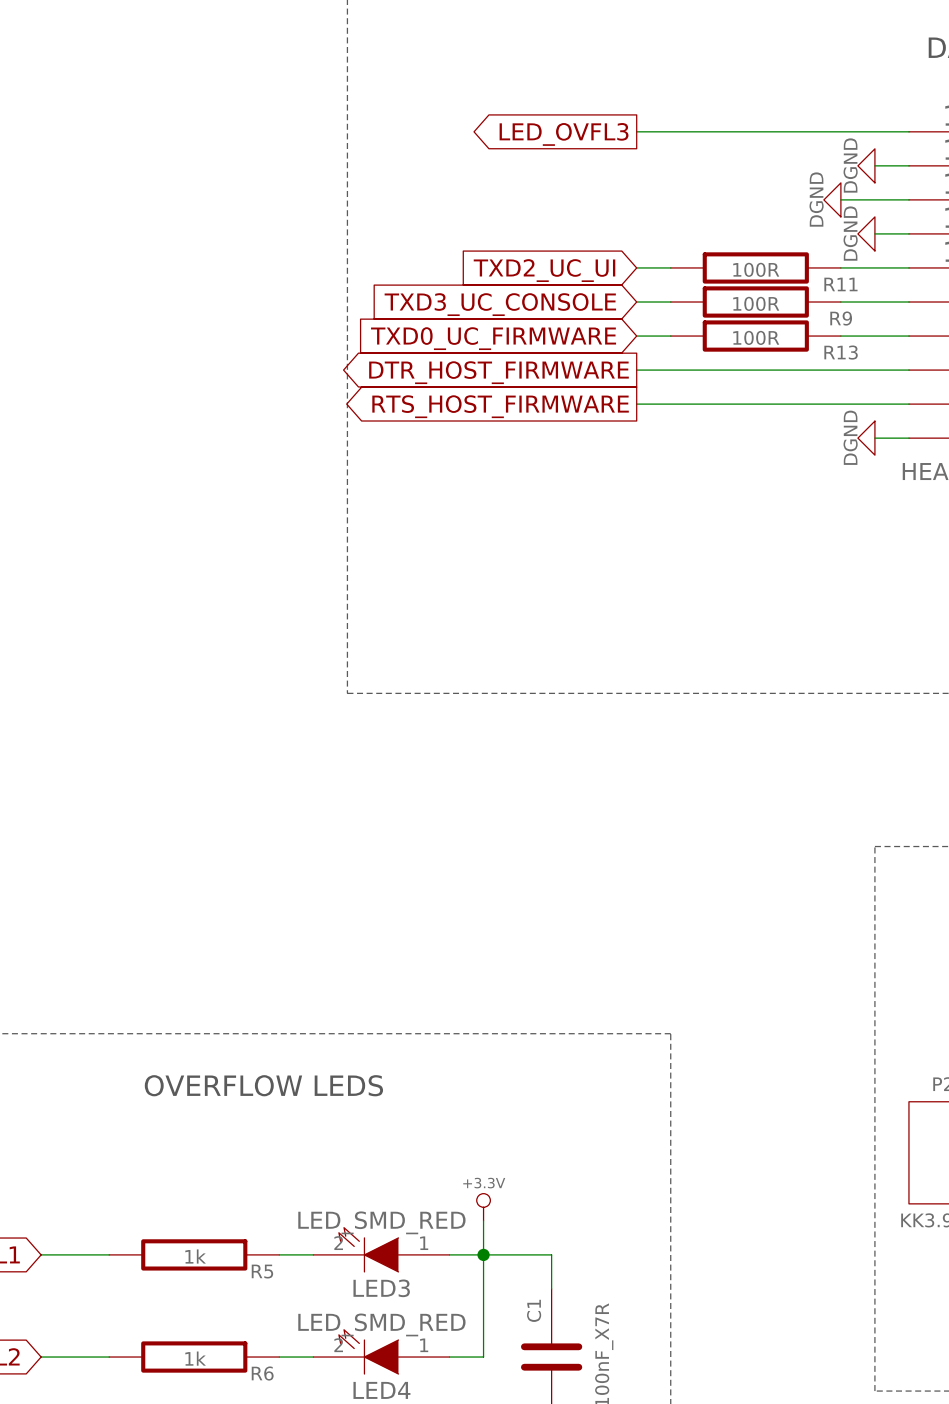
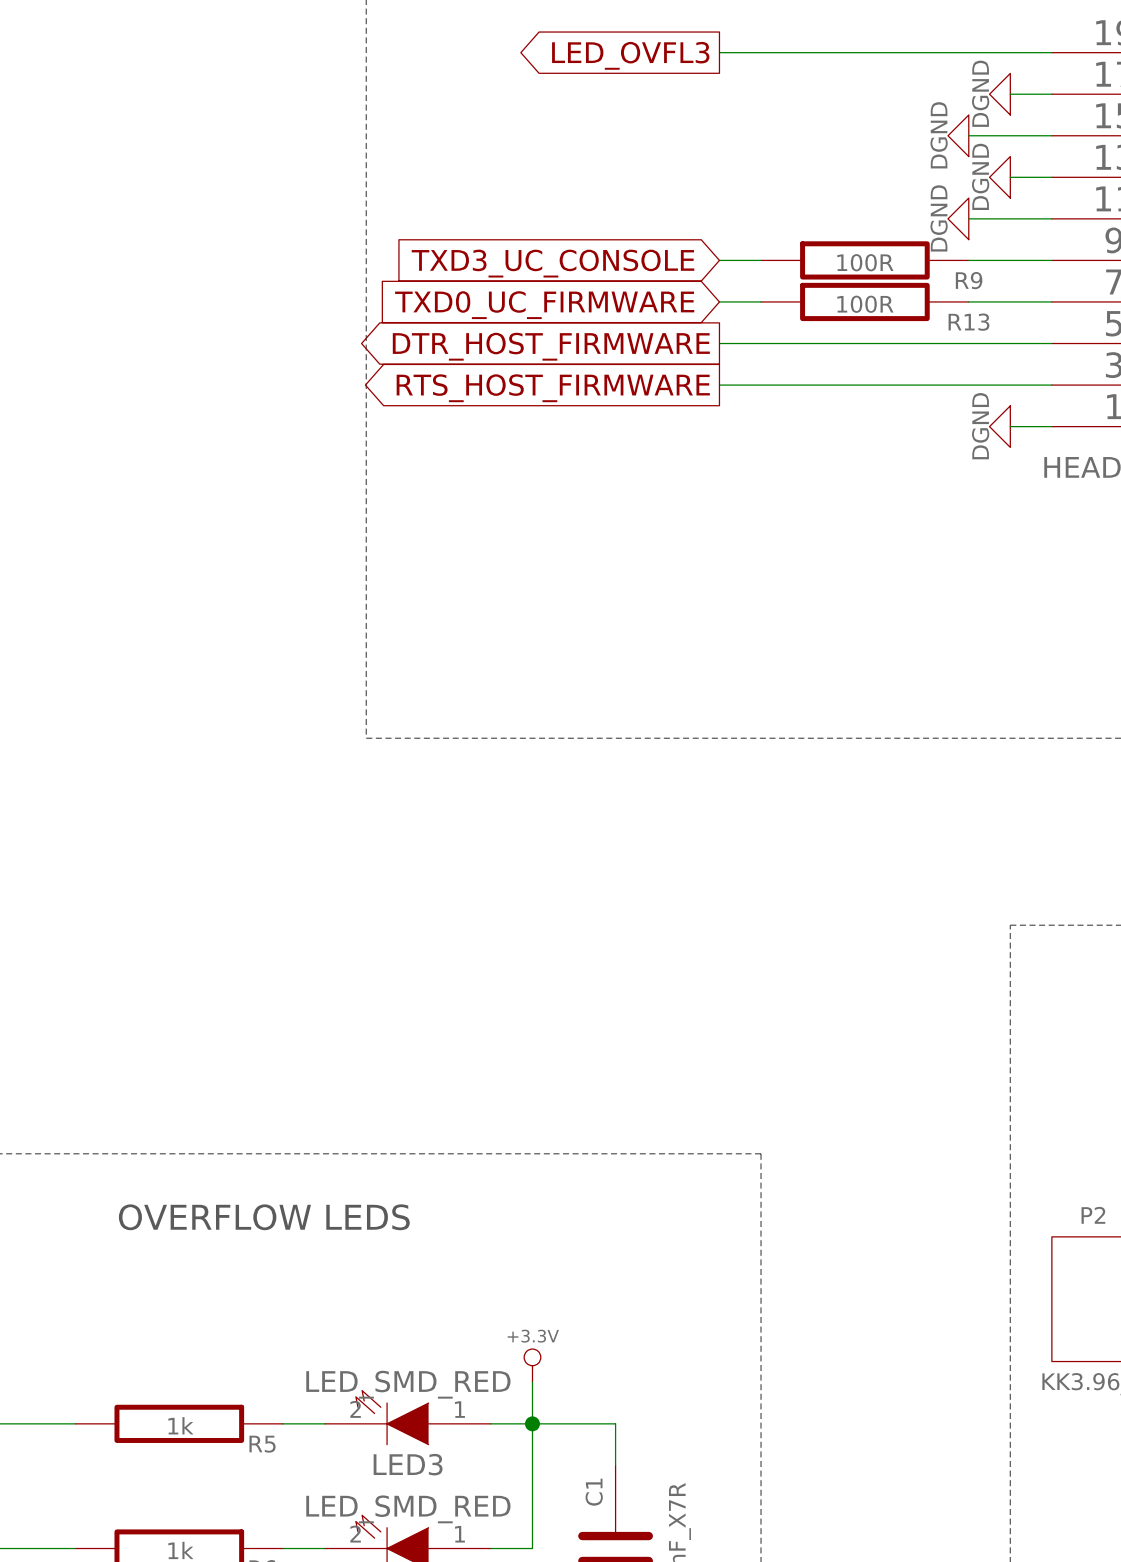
wire: (636, 267) (670, 267) -> none
R11: 100R (755, 267) -> none
power symbol: none -> DGND (958, 218)
global label: TXD2_UC_UI (544, 270) -> none

